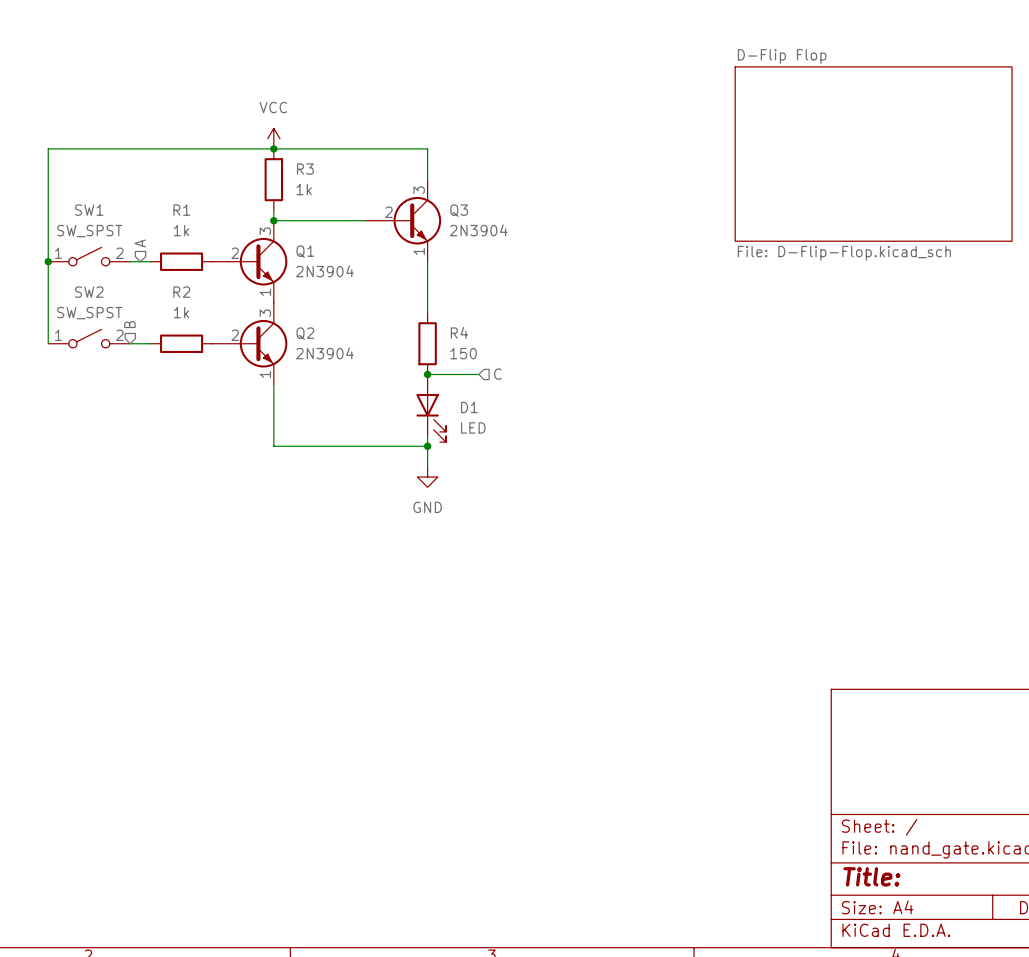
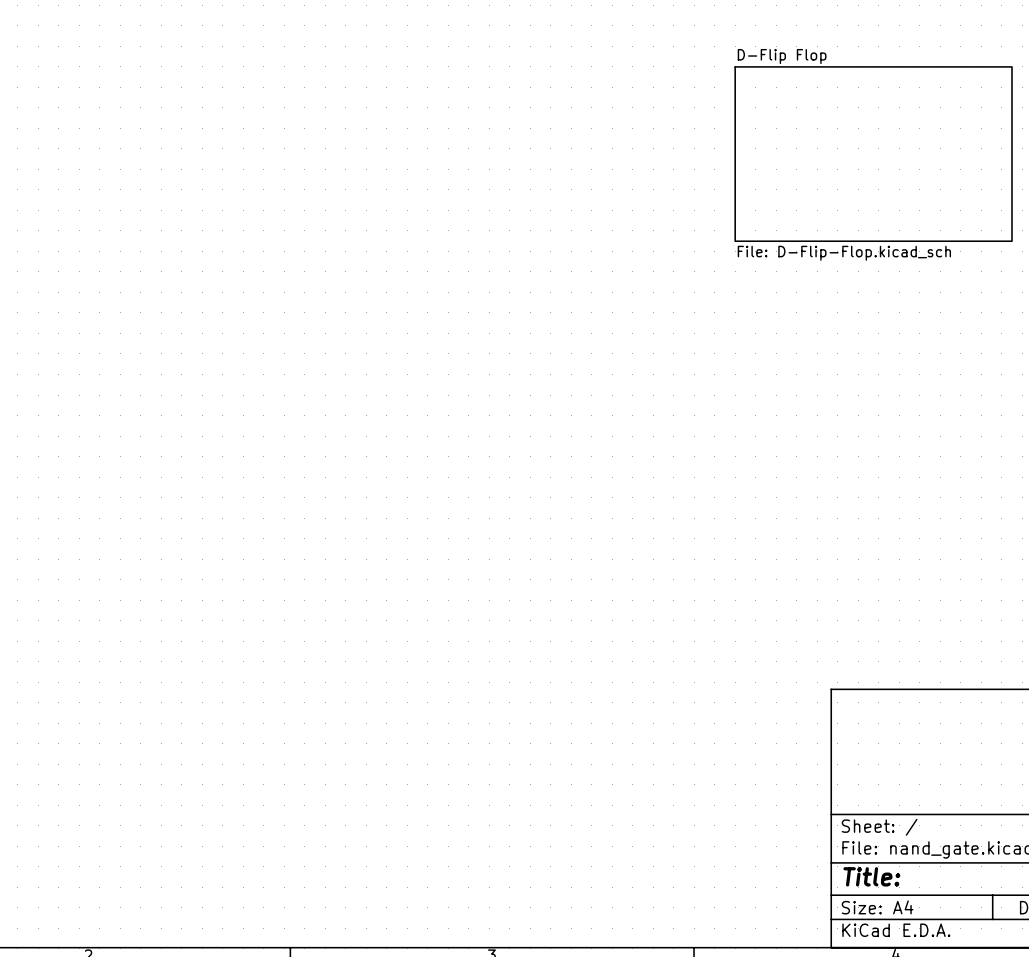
power symbol: VCC (273, 138) -> none
junction: (273, 148) -> none
R3: 1k (273, 179) -> none
wire: (427, 179) (427, 148) (48, 148) (48, 343) -> none
wire: (273, 210) (273, 220) (366, 220) -> none
junction: (273, 220) -> none
Q3: 2N3904 (403, 220) -> none
hierarchical label: A (140, 243) -> none
SW1: SW_SPST (89, 256) -> none
junction: (48, 261) -> none
wire: (130, 261) (150, 261) -> none
R1: 1k (181, 261) -> none
Q1: 2N3904 (249, 261) -> none
wire: (427, 261) (427, 312) -> none
hierarchical label: B (129, 324) -> none
SW2: SW_SPST (89, 338) -> none
wire: (130, 343) (150, 343) -> none
R2: 1k (181, 343) -> none
Q2: 2N3904 (249, 343) -> none
R4: 150 (427, 343) -> none
wire: (427, 374) (478, 374) -> none
junction: (427, 374) -> none
hierarchical label: C (497, 374) -> none
wire: (273, 384) (273, 446) (427, 446) -> none
D1: LED (431, 408) -> none
wire: (427, 436) (427, 466) -> none
junction: (427, 446) -> none
power symbol: GND (427, 477) -> none

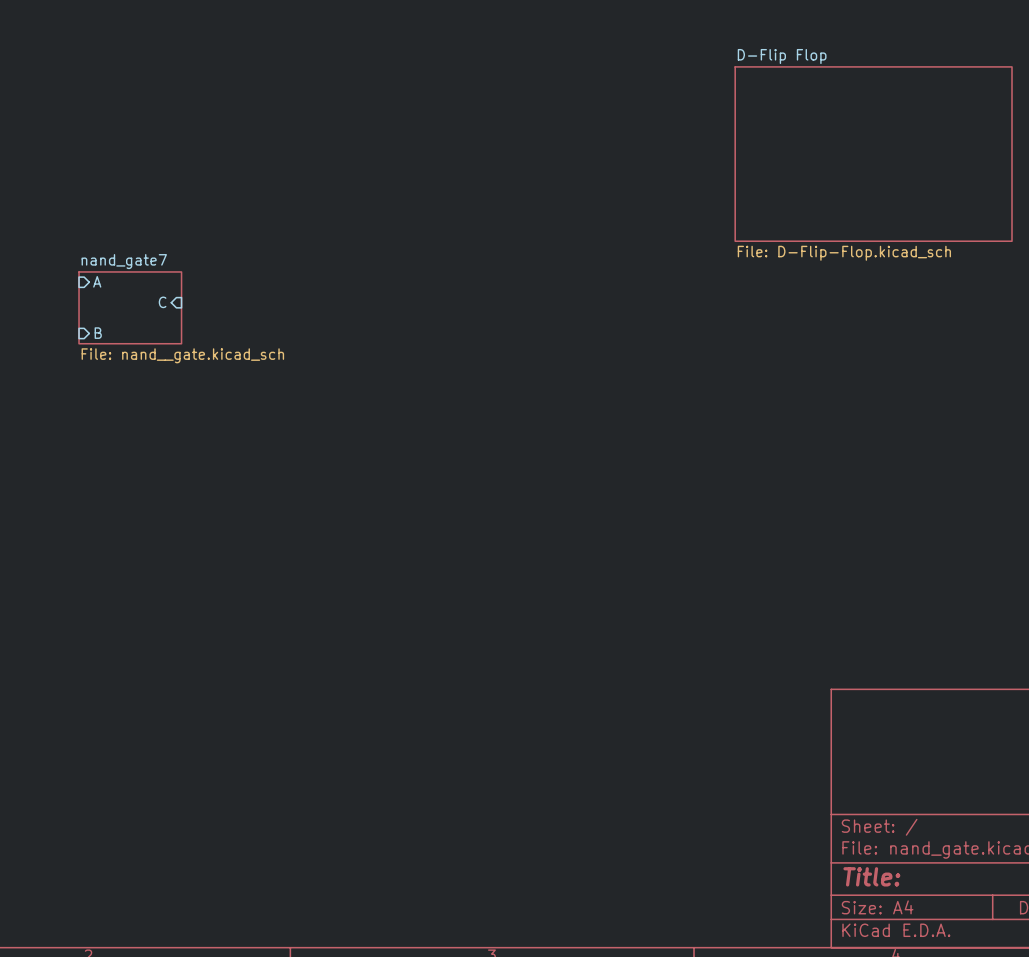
sheet pin: none -> A (97, 281)
sheet pin: none -> C (162, 302)
sheet nand_gate7: none -> File: nand__gate.kicad_sch (130, 307)
sheet pin: none -> B (98, 333)

